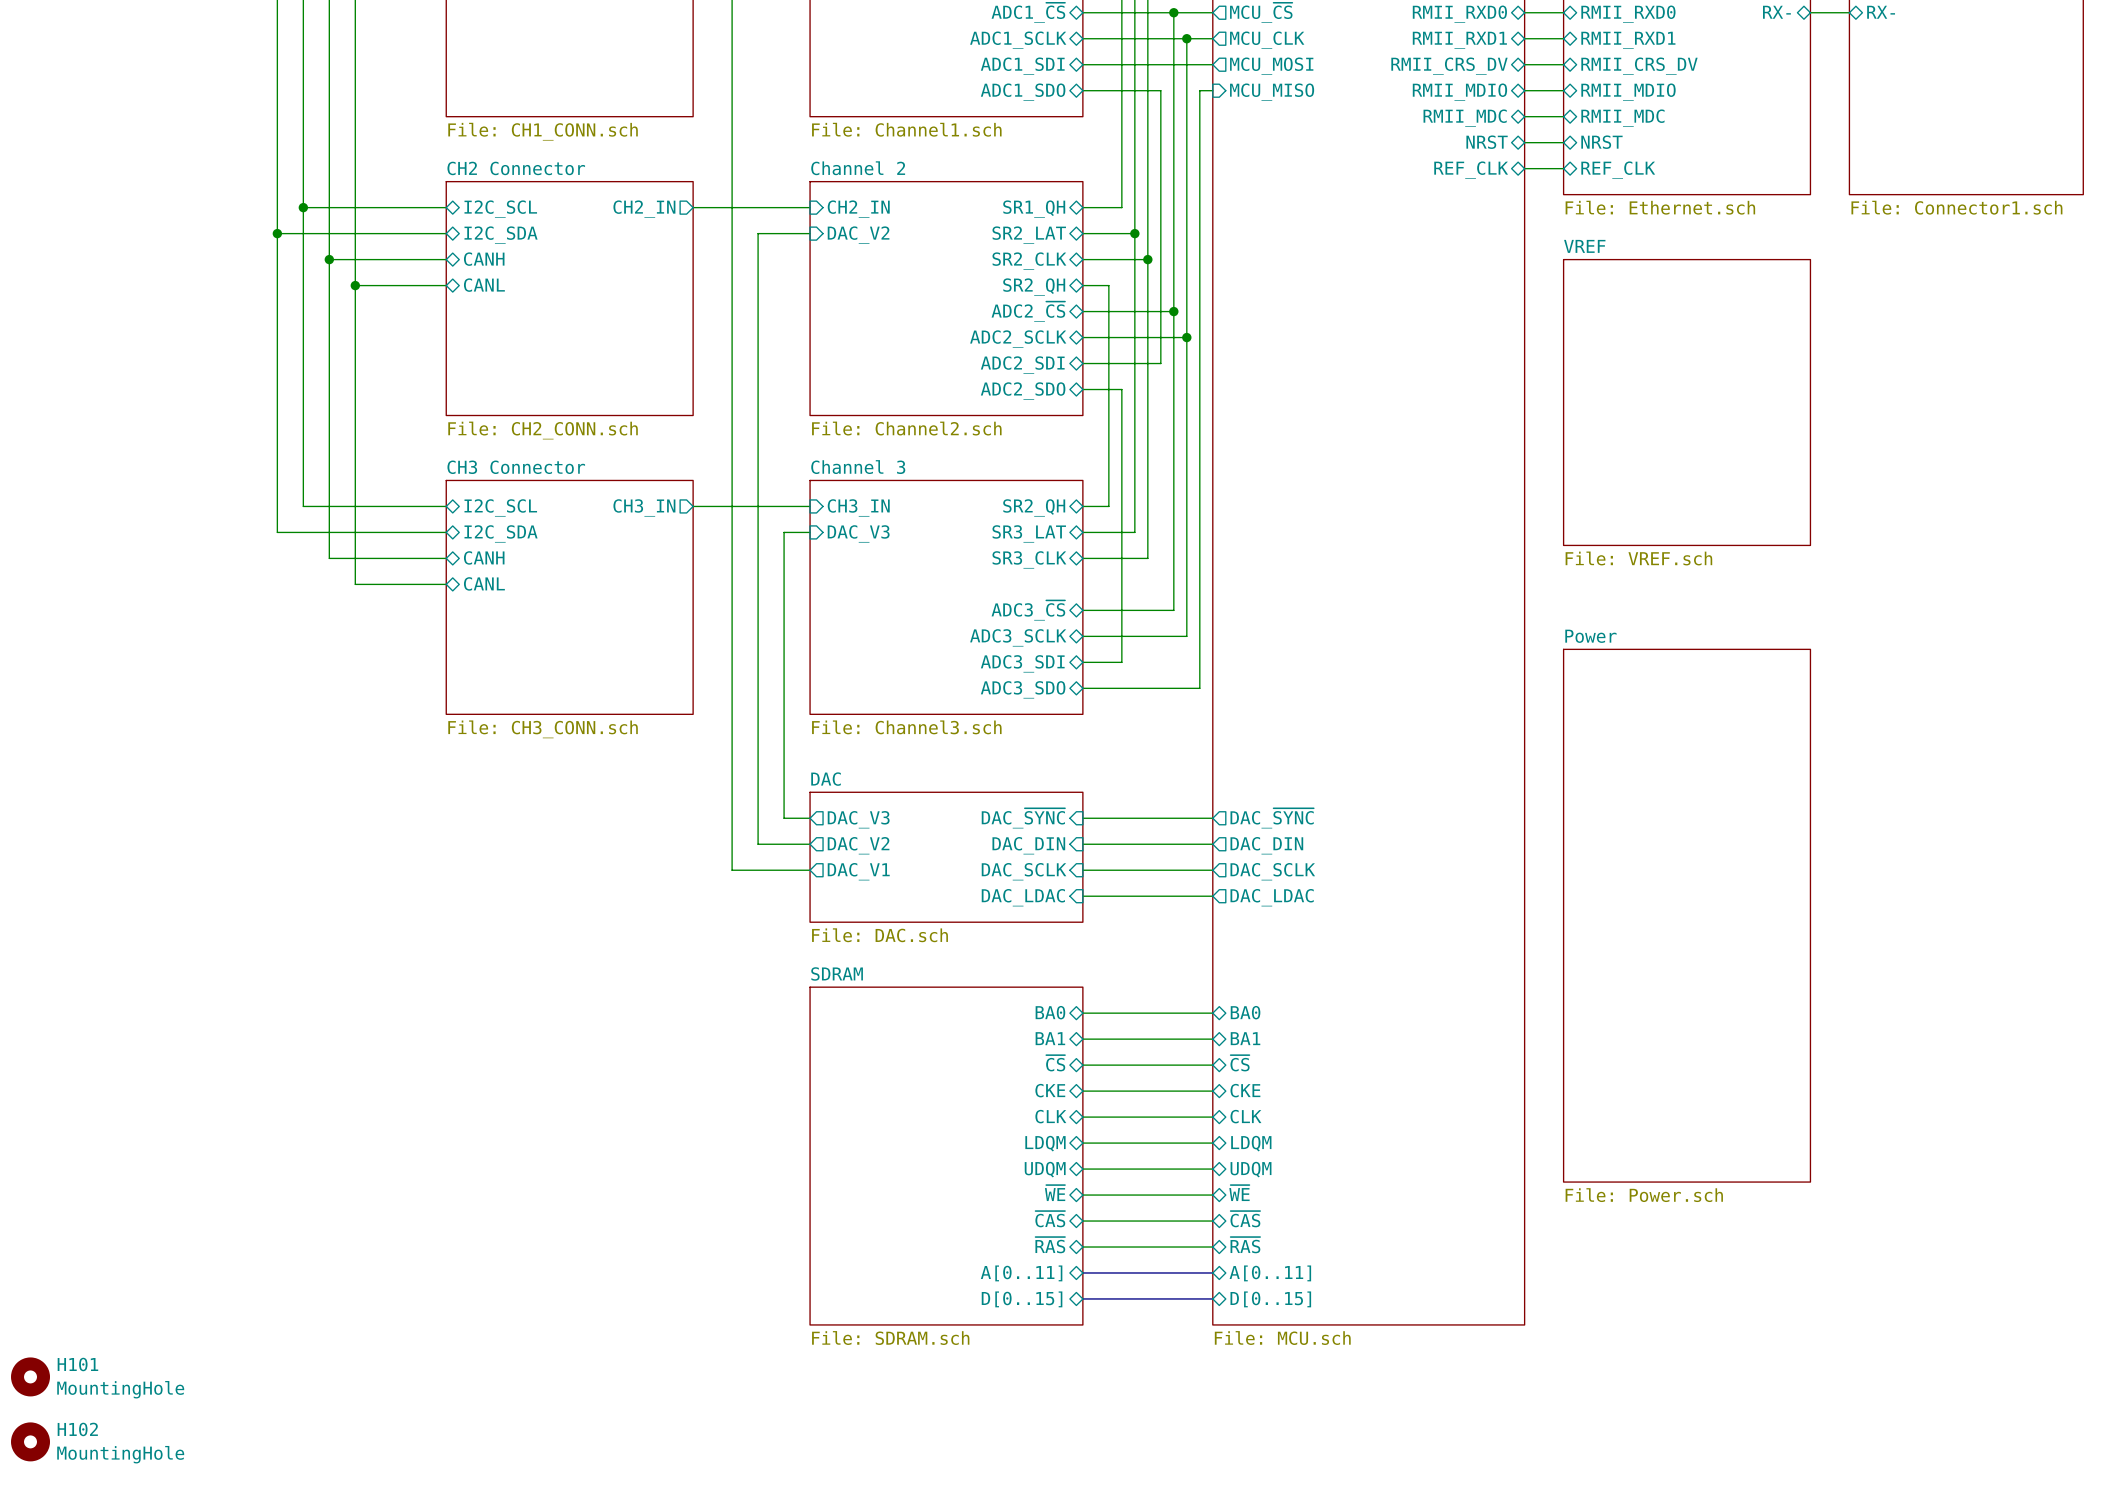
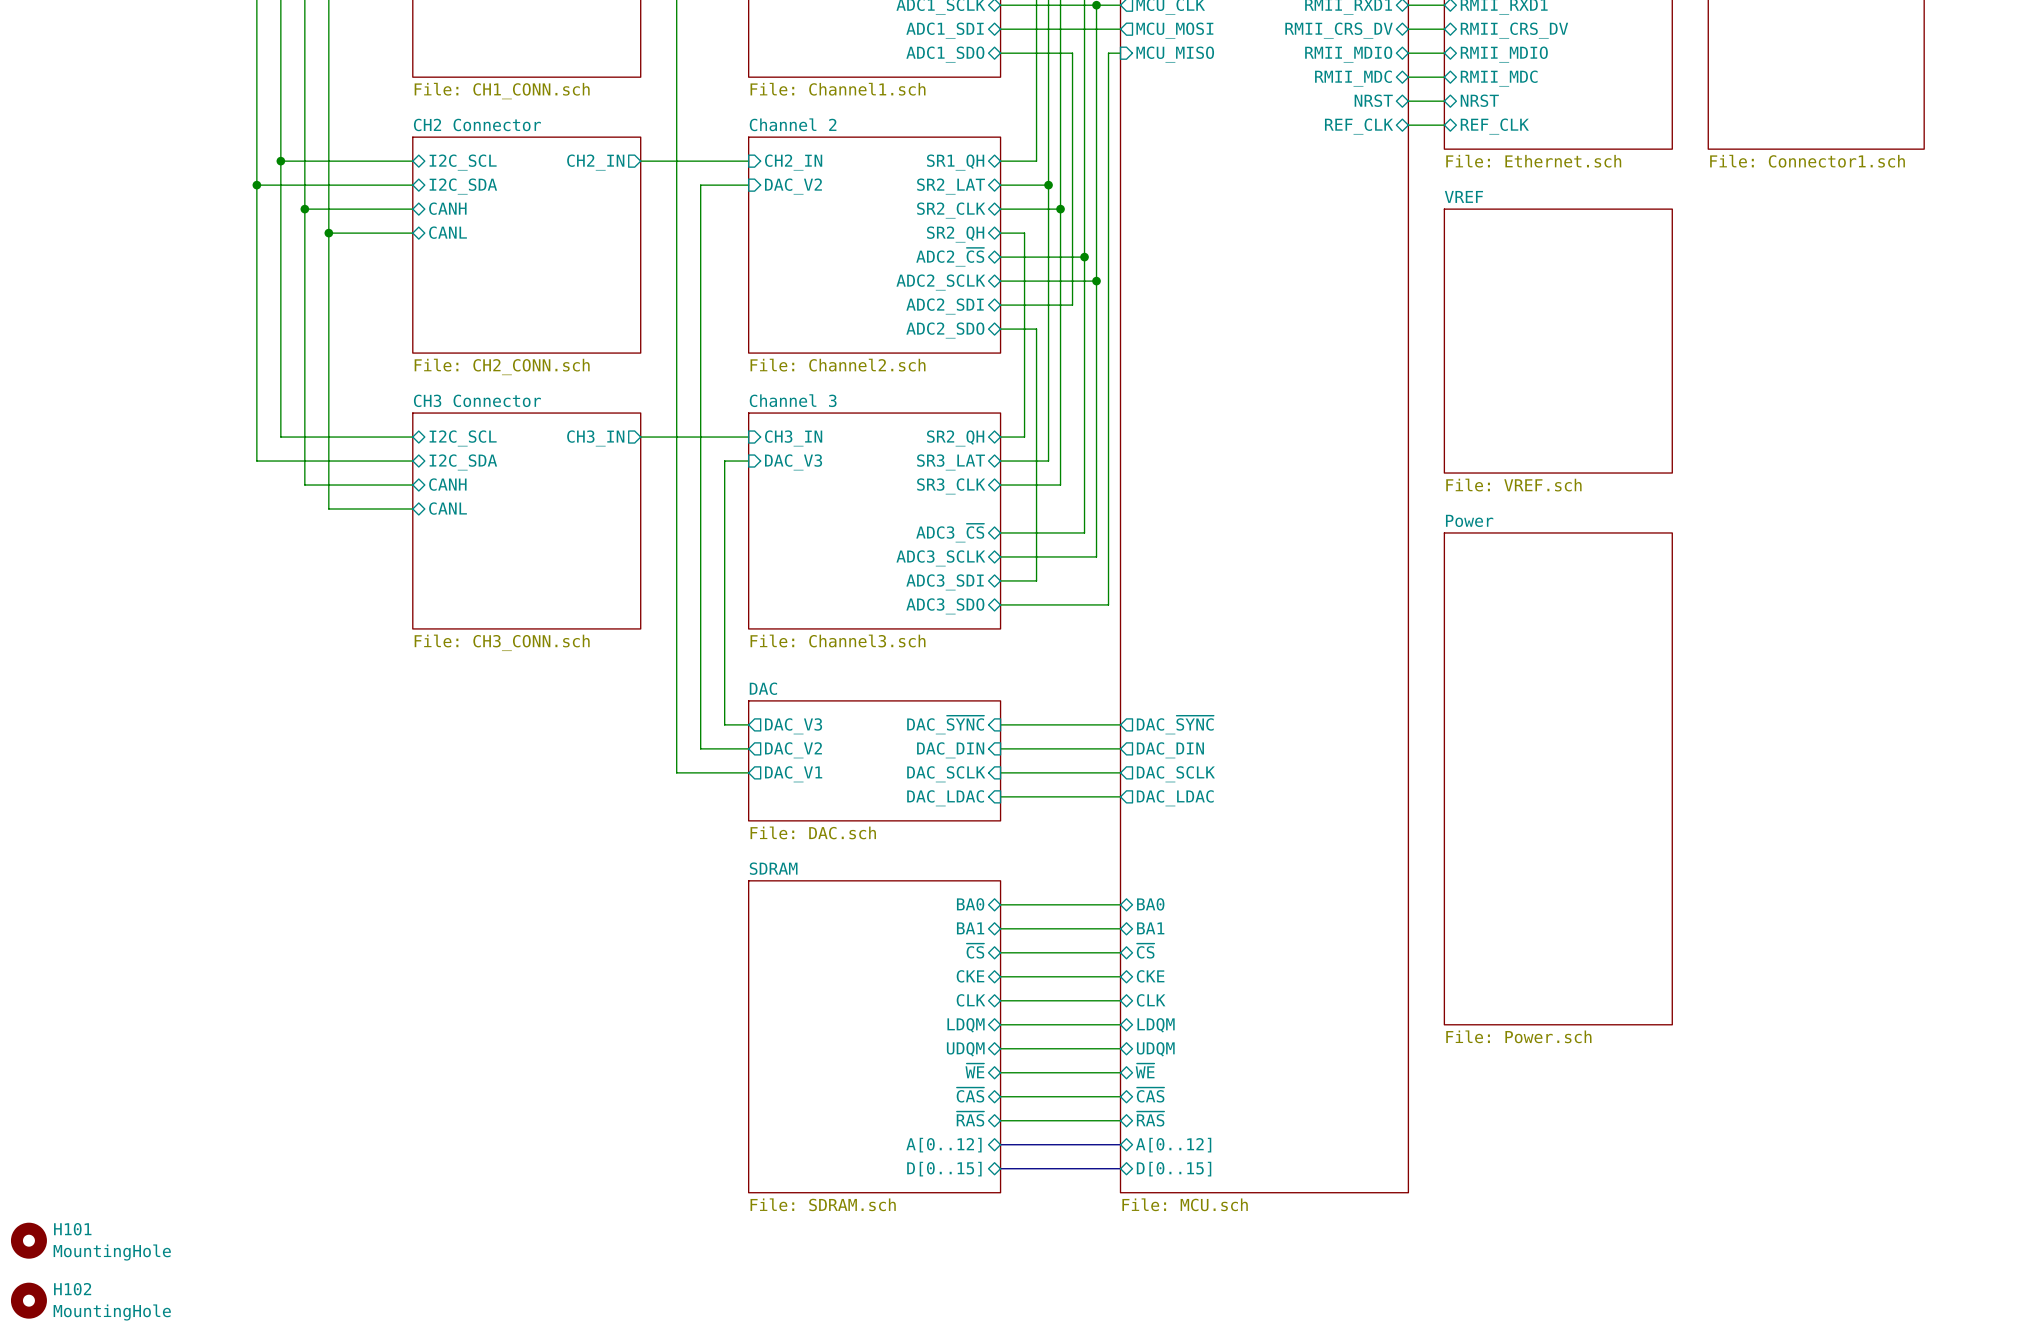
sheet Power position: (1687, 915) -> (1558, 778)
sheet pin: A[0..11] (1021, 1273) -> A[0..12] (943, 1145)
sheet pin: A[0..11] (1270, 1273) -> A[0..12] (1173, 1145)

